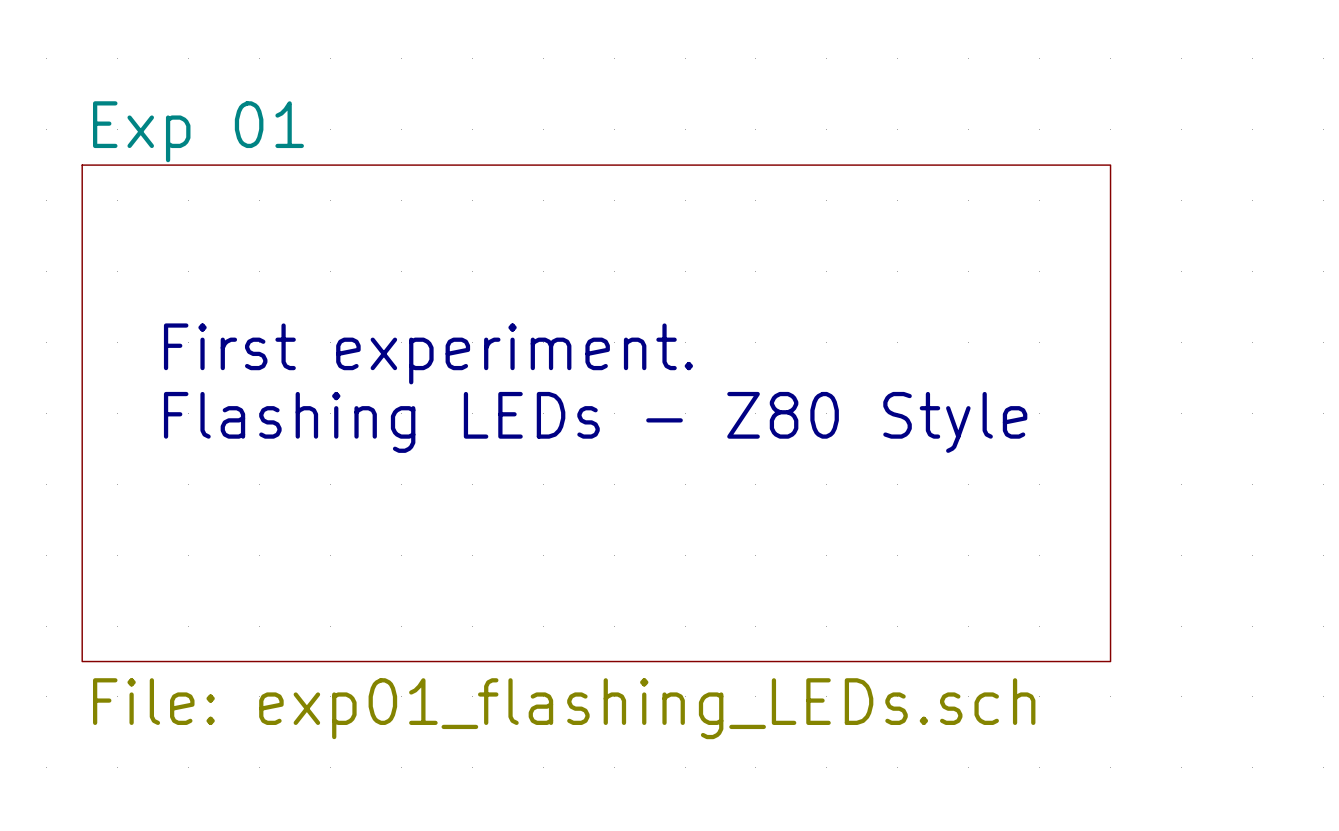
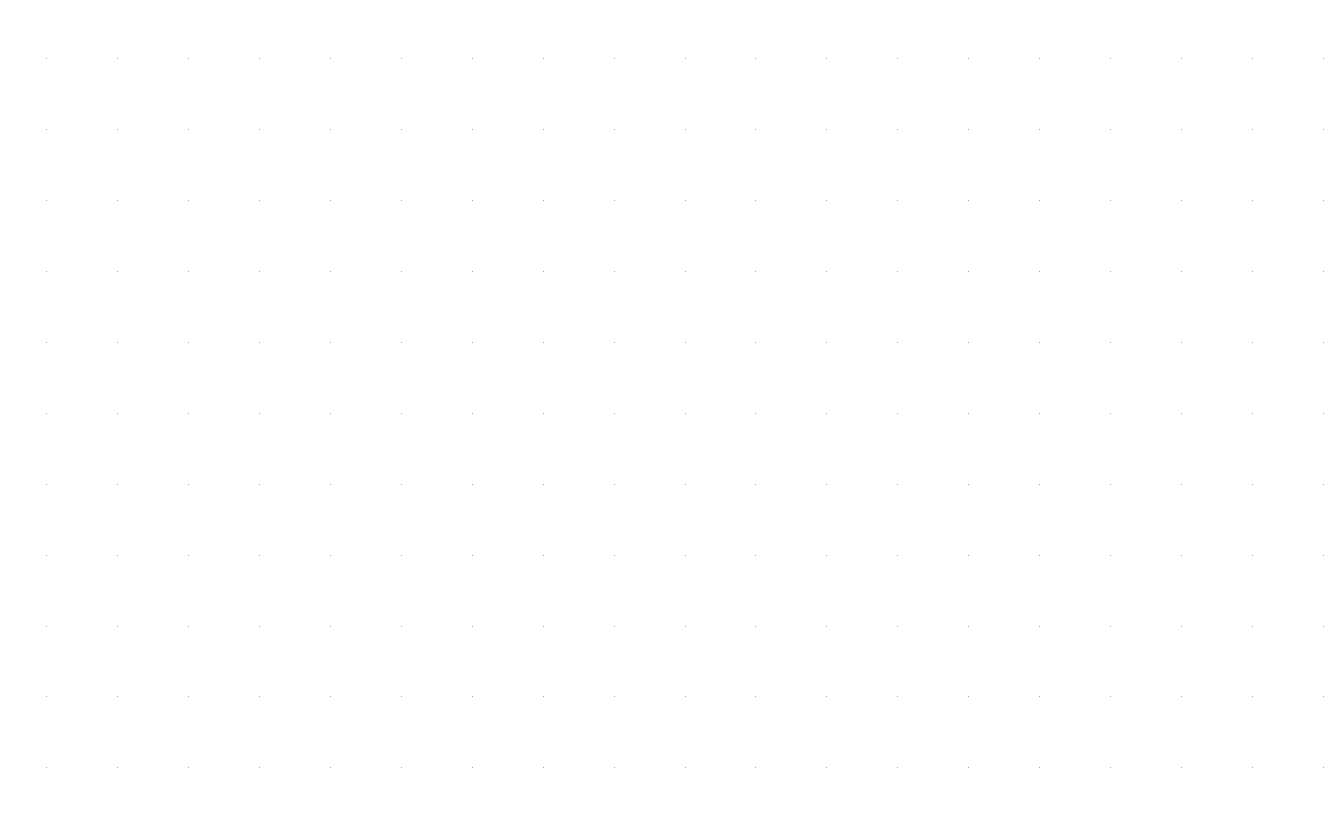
text: First experiment. (428, 353) -> none
sheet Exp 01: File: exp01_flashing_LEDs.sch (596, 413) -> none
text: Flashing LEDs - Z80 Style (595, 422) -> none

